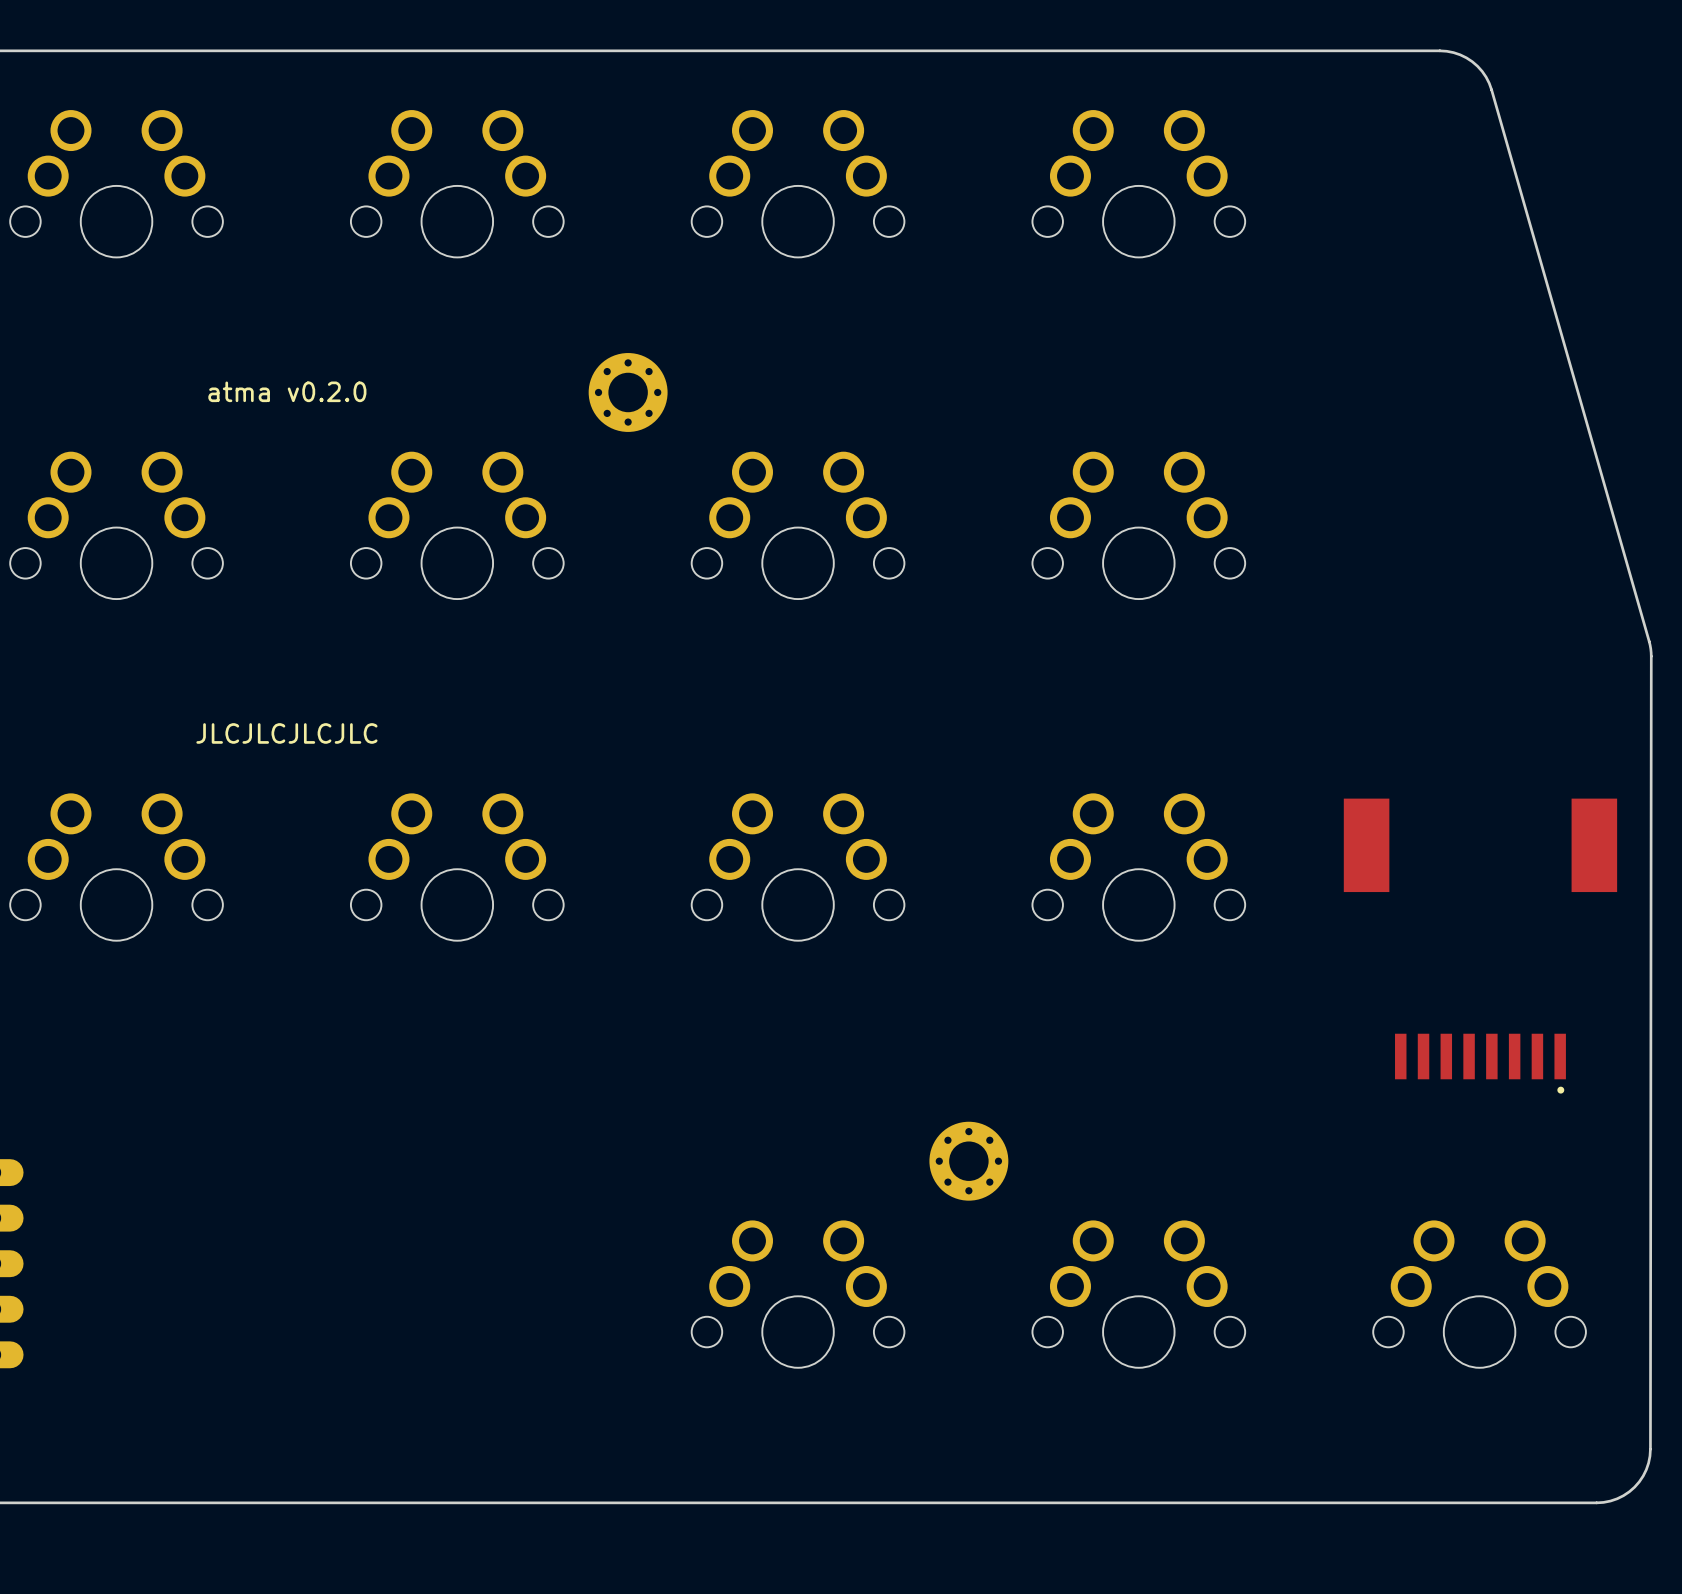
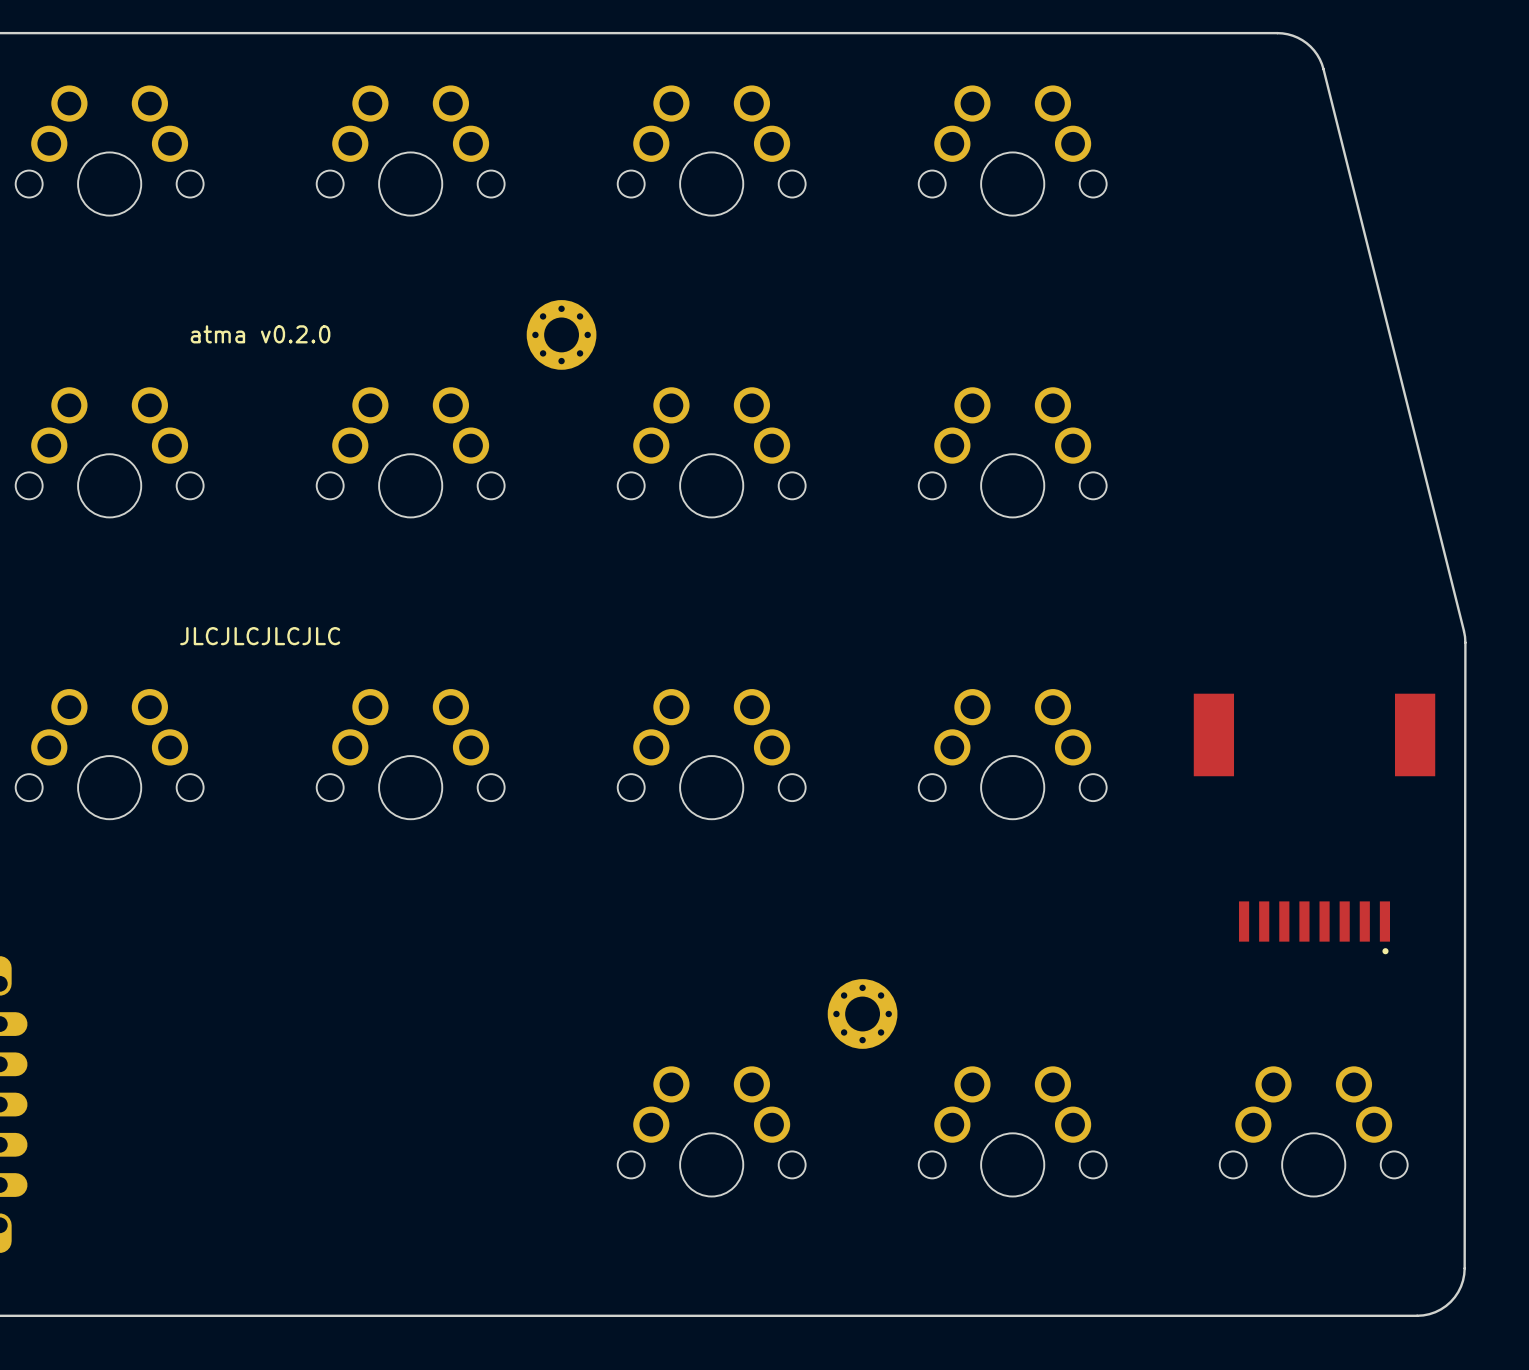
board edge: (1438, 50) (1453, 52) (1472, 61) (1486, 77) (1491, 89) (1650, 648) (1650, 1449) -> (1277, 33) (1292, 35) (1306, 43) (1317, 54) (1321, 64) (1465, 636) (1464, 1268)

